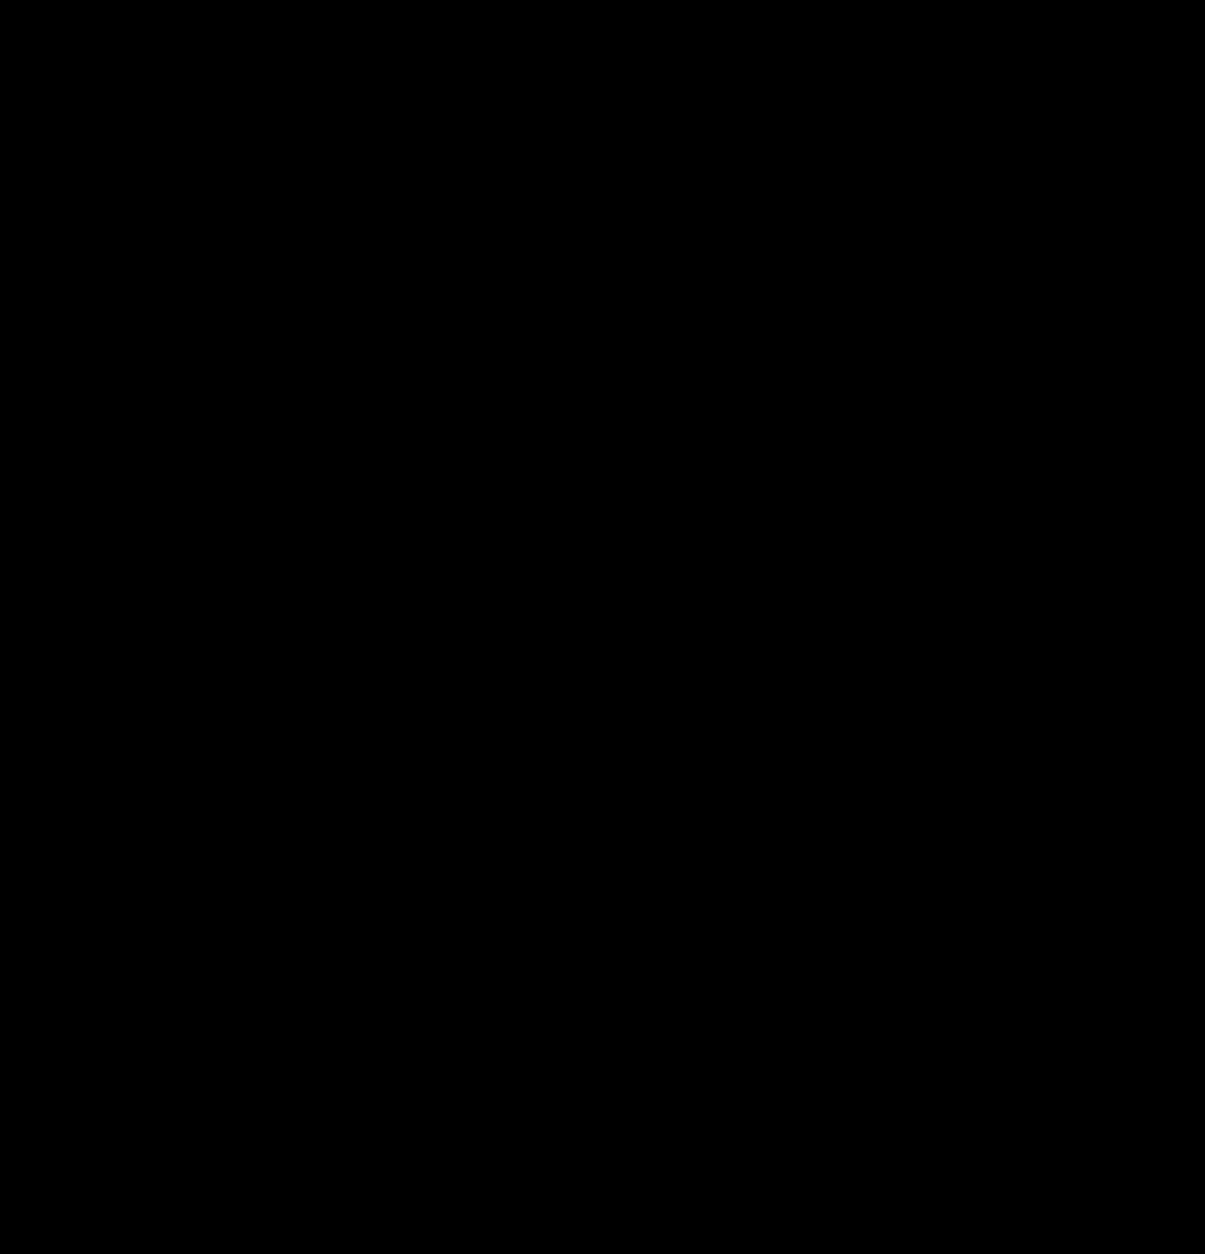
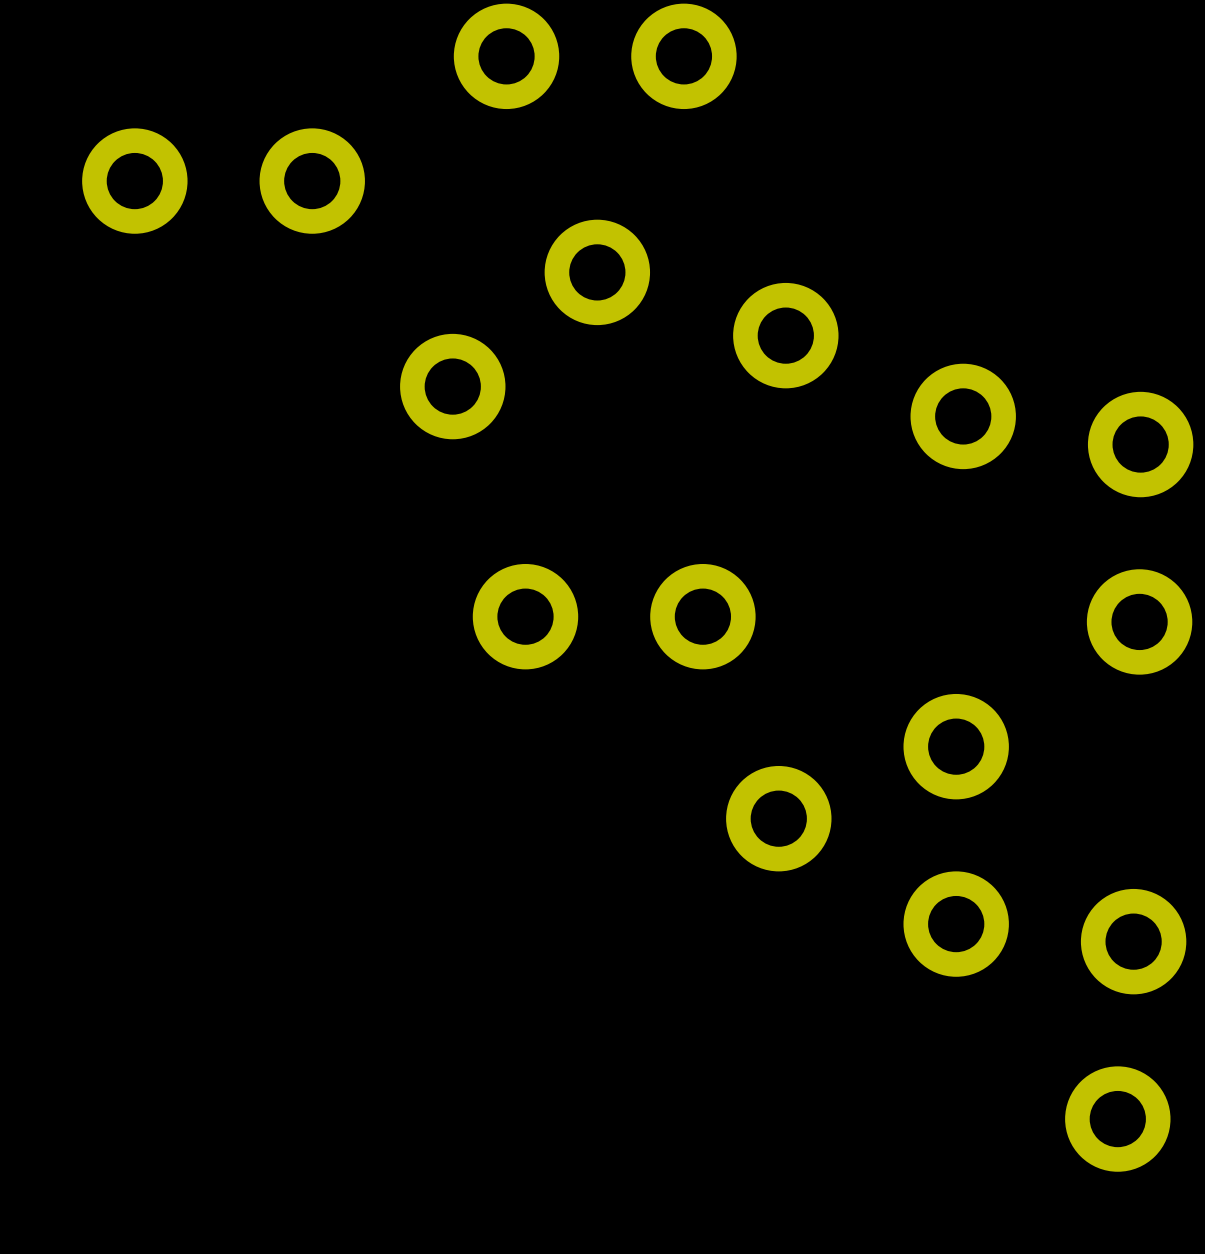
part: none -> (506, 56)
part: none -> (683, 56)
part: none -> (134, 181)
part: none -> (312, 181)
part: none -> (597, 272)
part: none -> (785, 335)
part: none -> (452, 386)
part: none -> (963, 416)
part: none -> (1140, 444)
part: none -> (525, 616)
part: none -> (702, 616)
part: none -> (1139, 621)
part: none -> (956, 746)
part: none -> (778, 818)
part: none -> (956, 924)
part: none -> (1133, 941)
part: none -> (1117, 1119)

